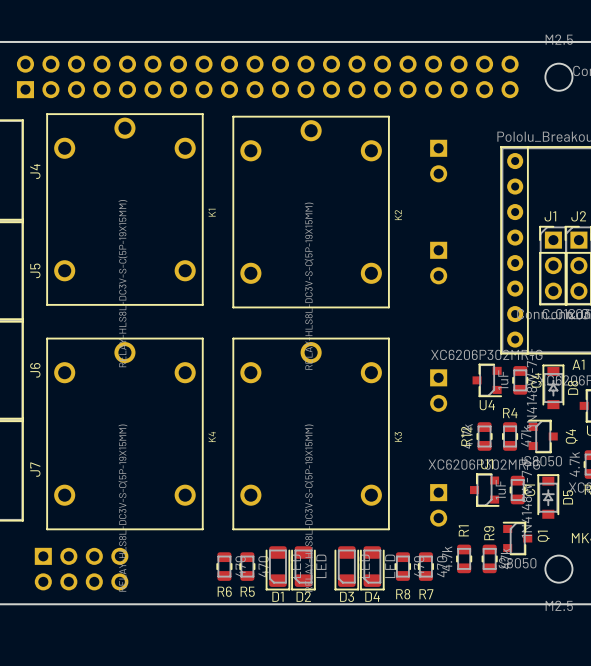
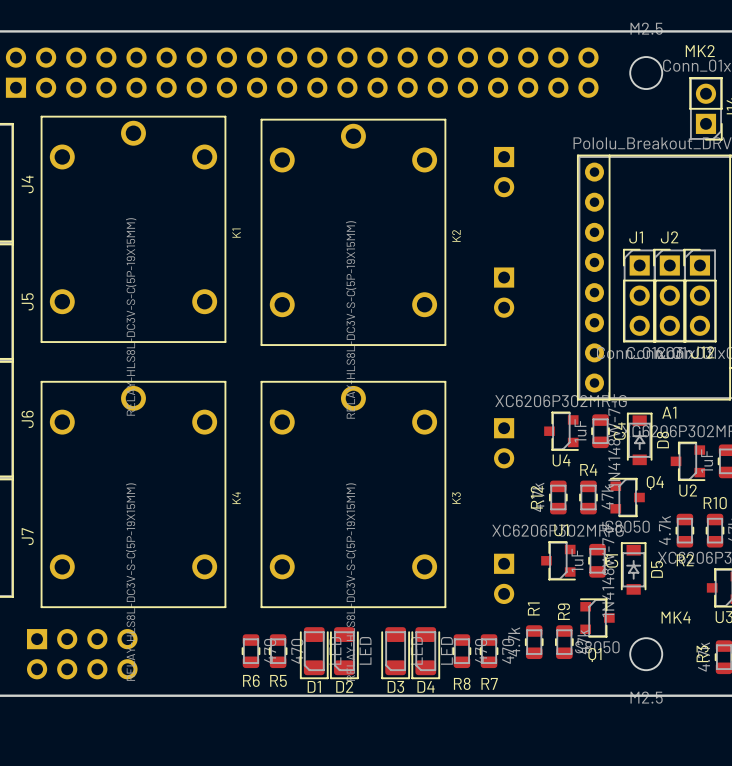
Q4 name rotation: 0° (571, 436) -> 90° clockwise (655, 483)
Q1 name rotation: 0° (543, 536) -> 90° clockwise (594, 655)
Q1 name position: Q1 (543, 536) -> Q1 (594, 655)

